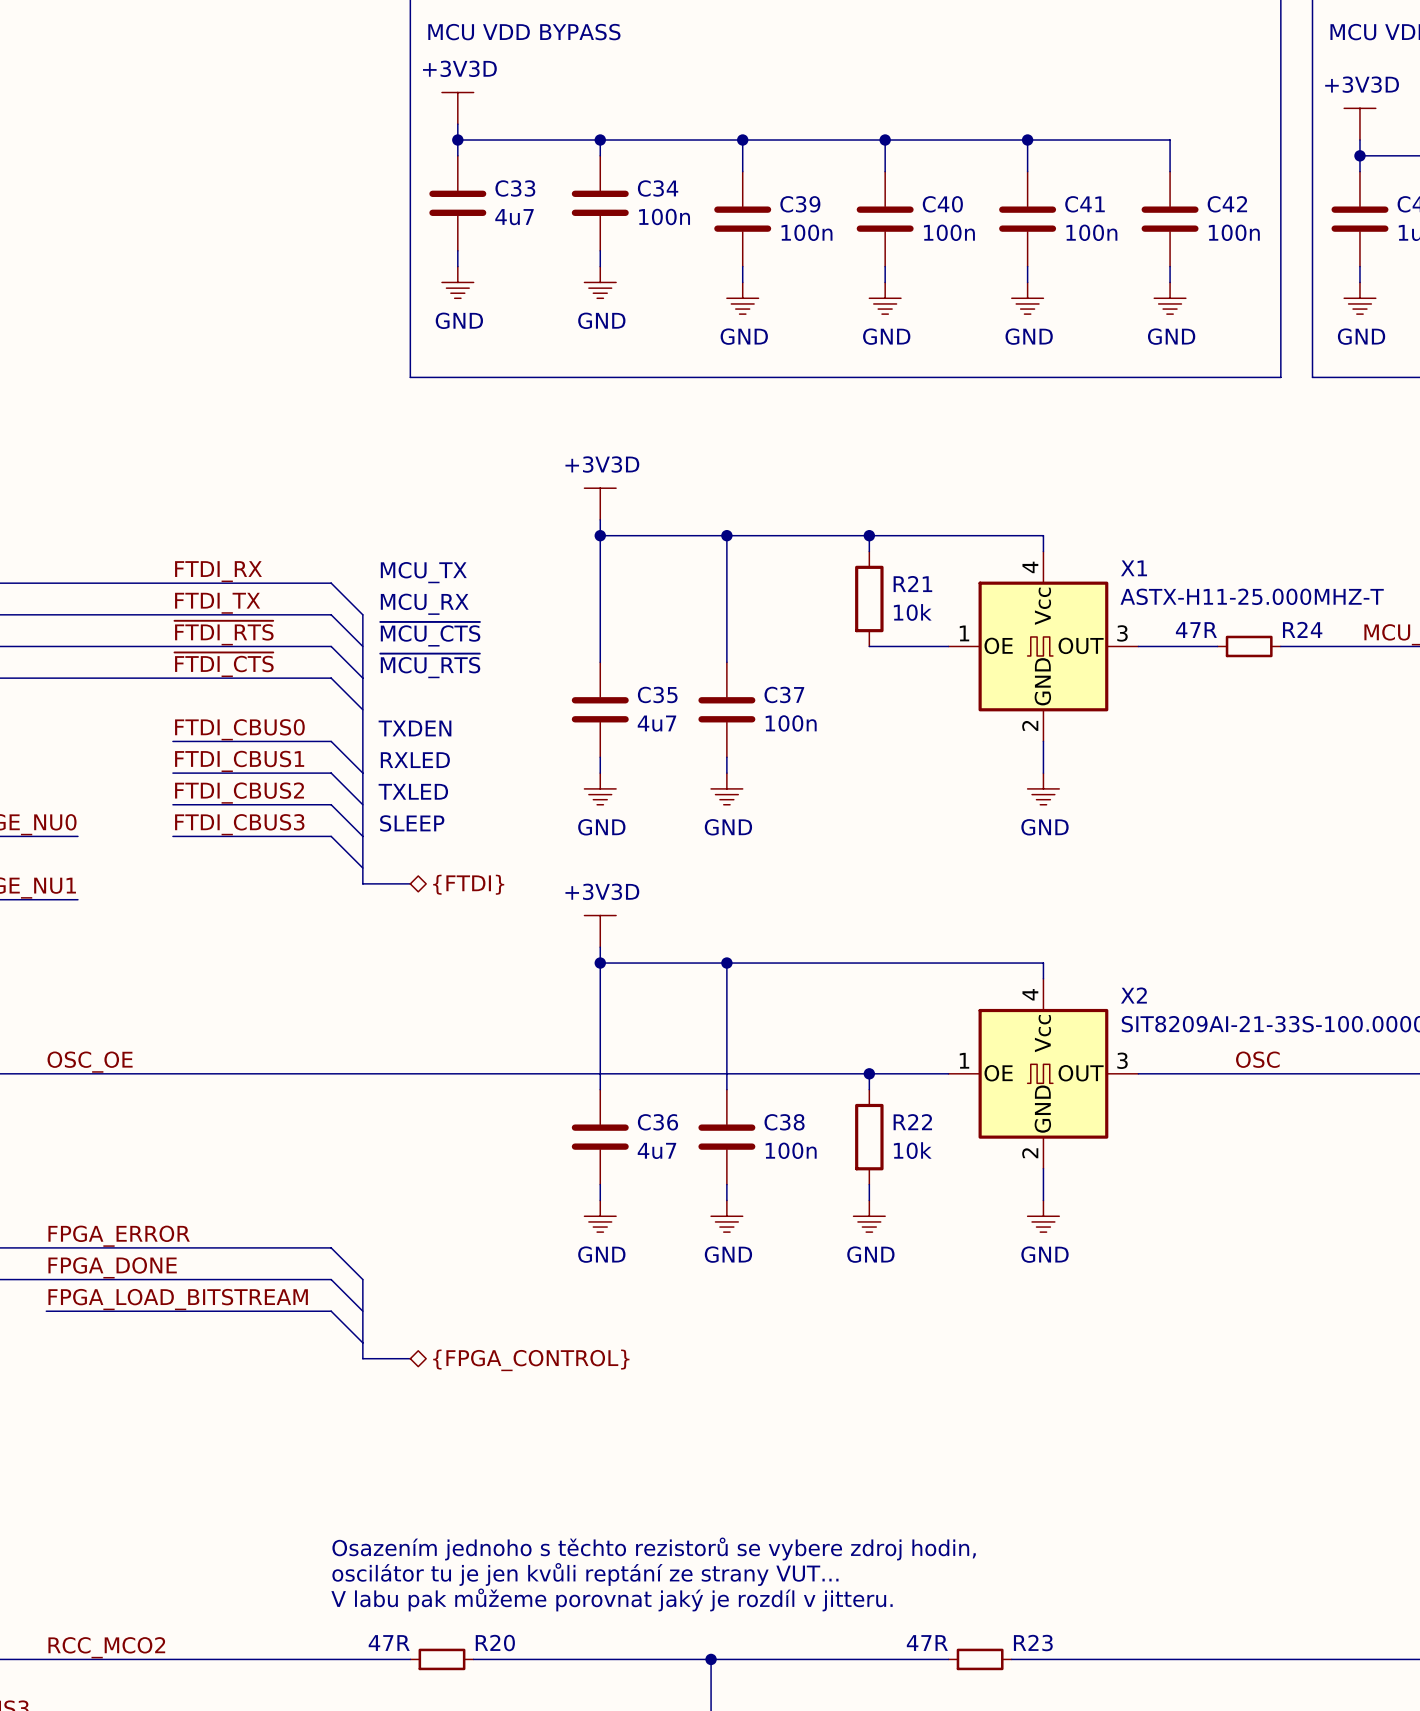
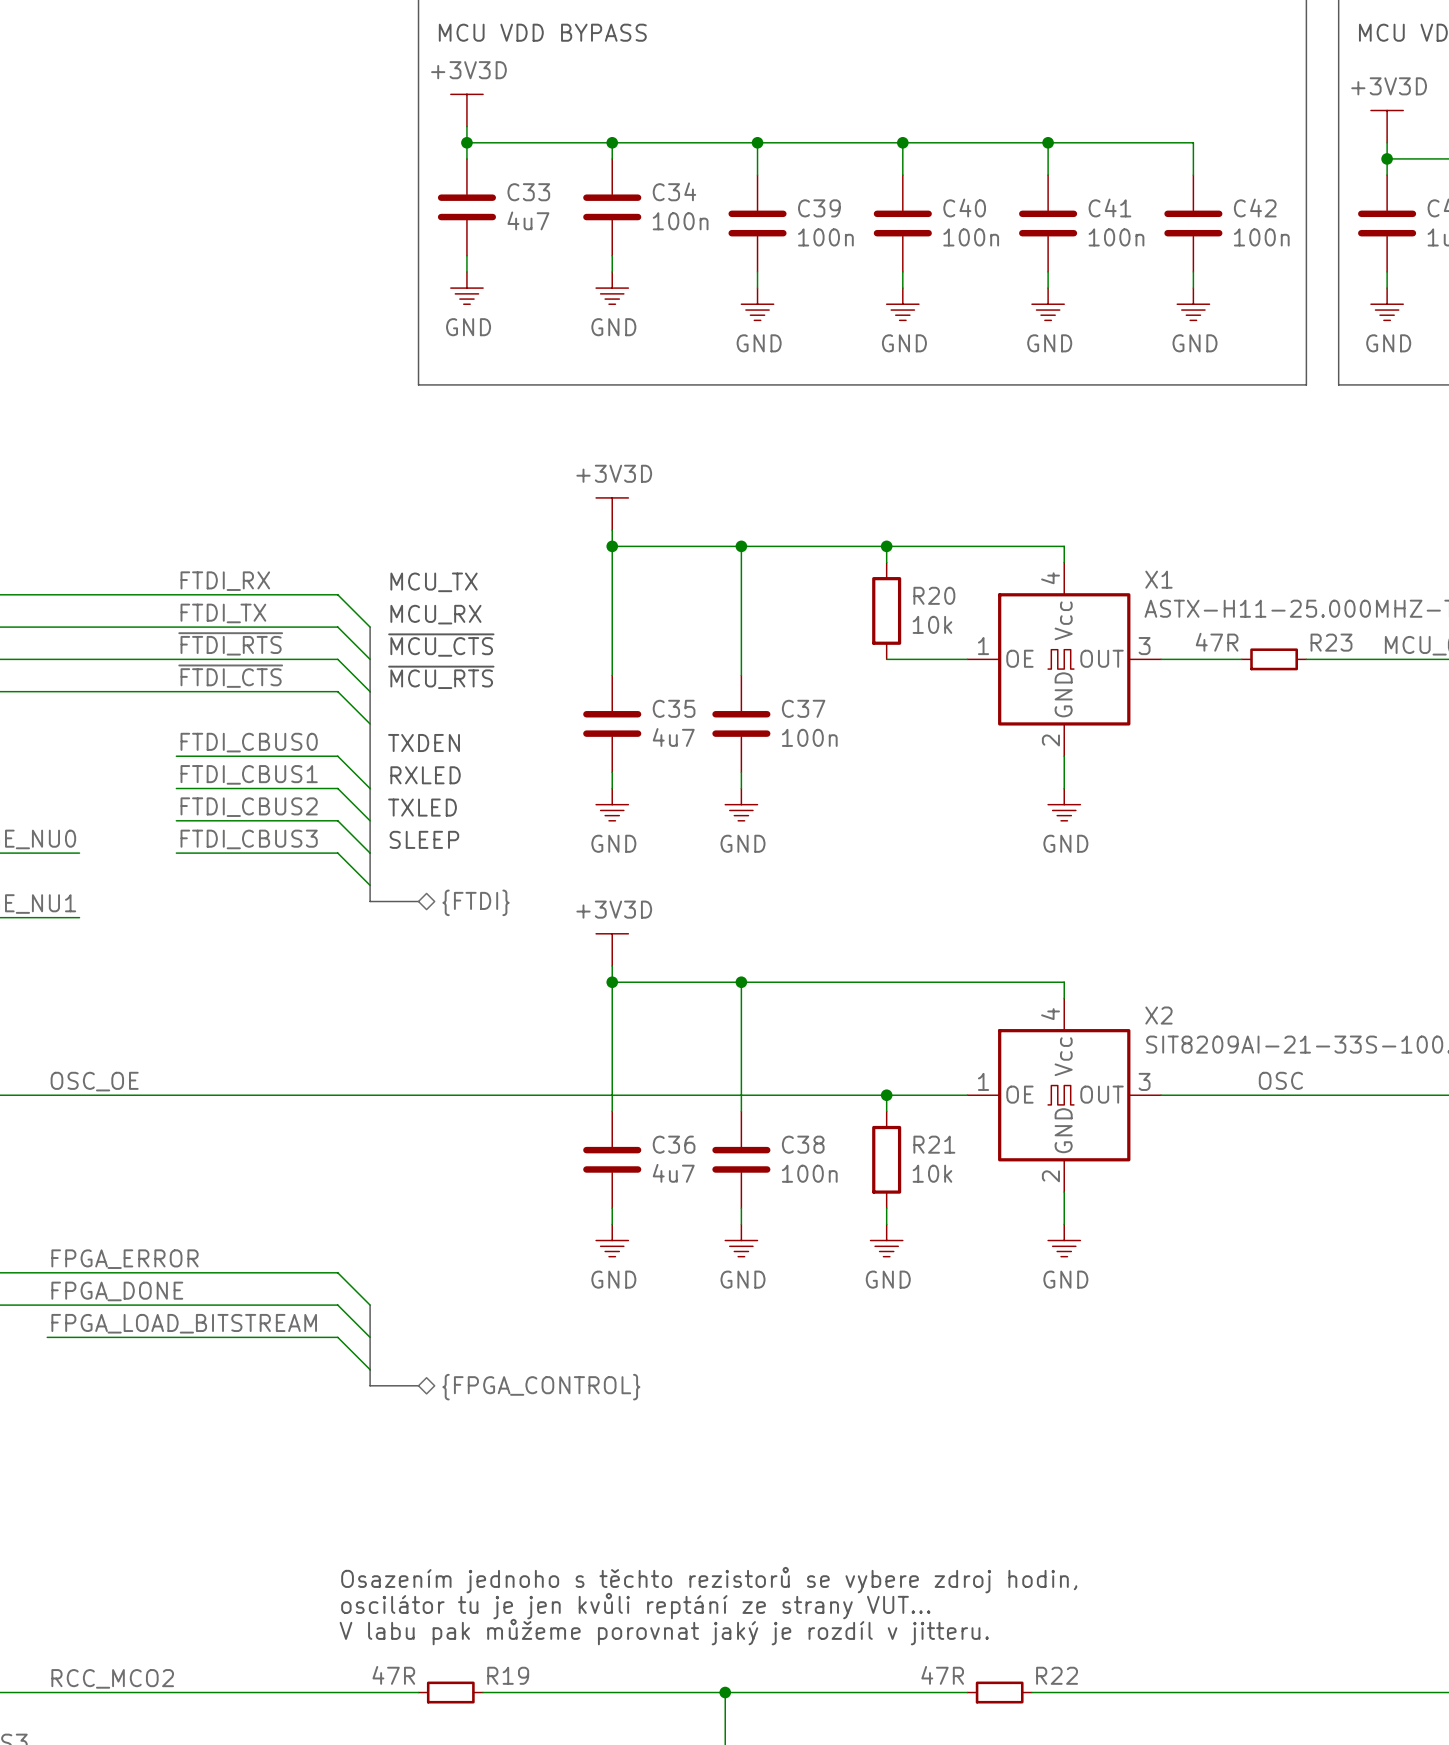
R21 name: R21 (912, 584) -> R20 (934, 595)
R24 name: R24 (1302, 629) -> R23 (1331, 642)
R22 name: R22 (912, 1122) -> R21 (934, 1144)
R20 name: R20 (495, 1643) -> R19 (508, 1675)
R23 name: R23 (1033, 1643) -> R22 (1057, 1675)

